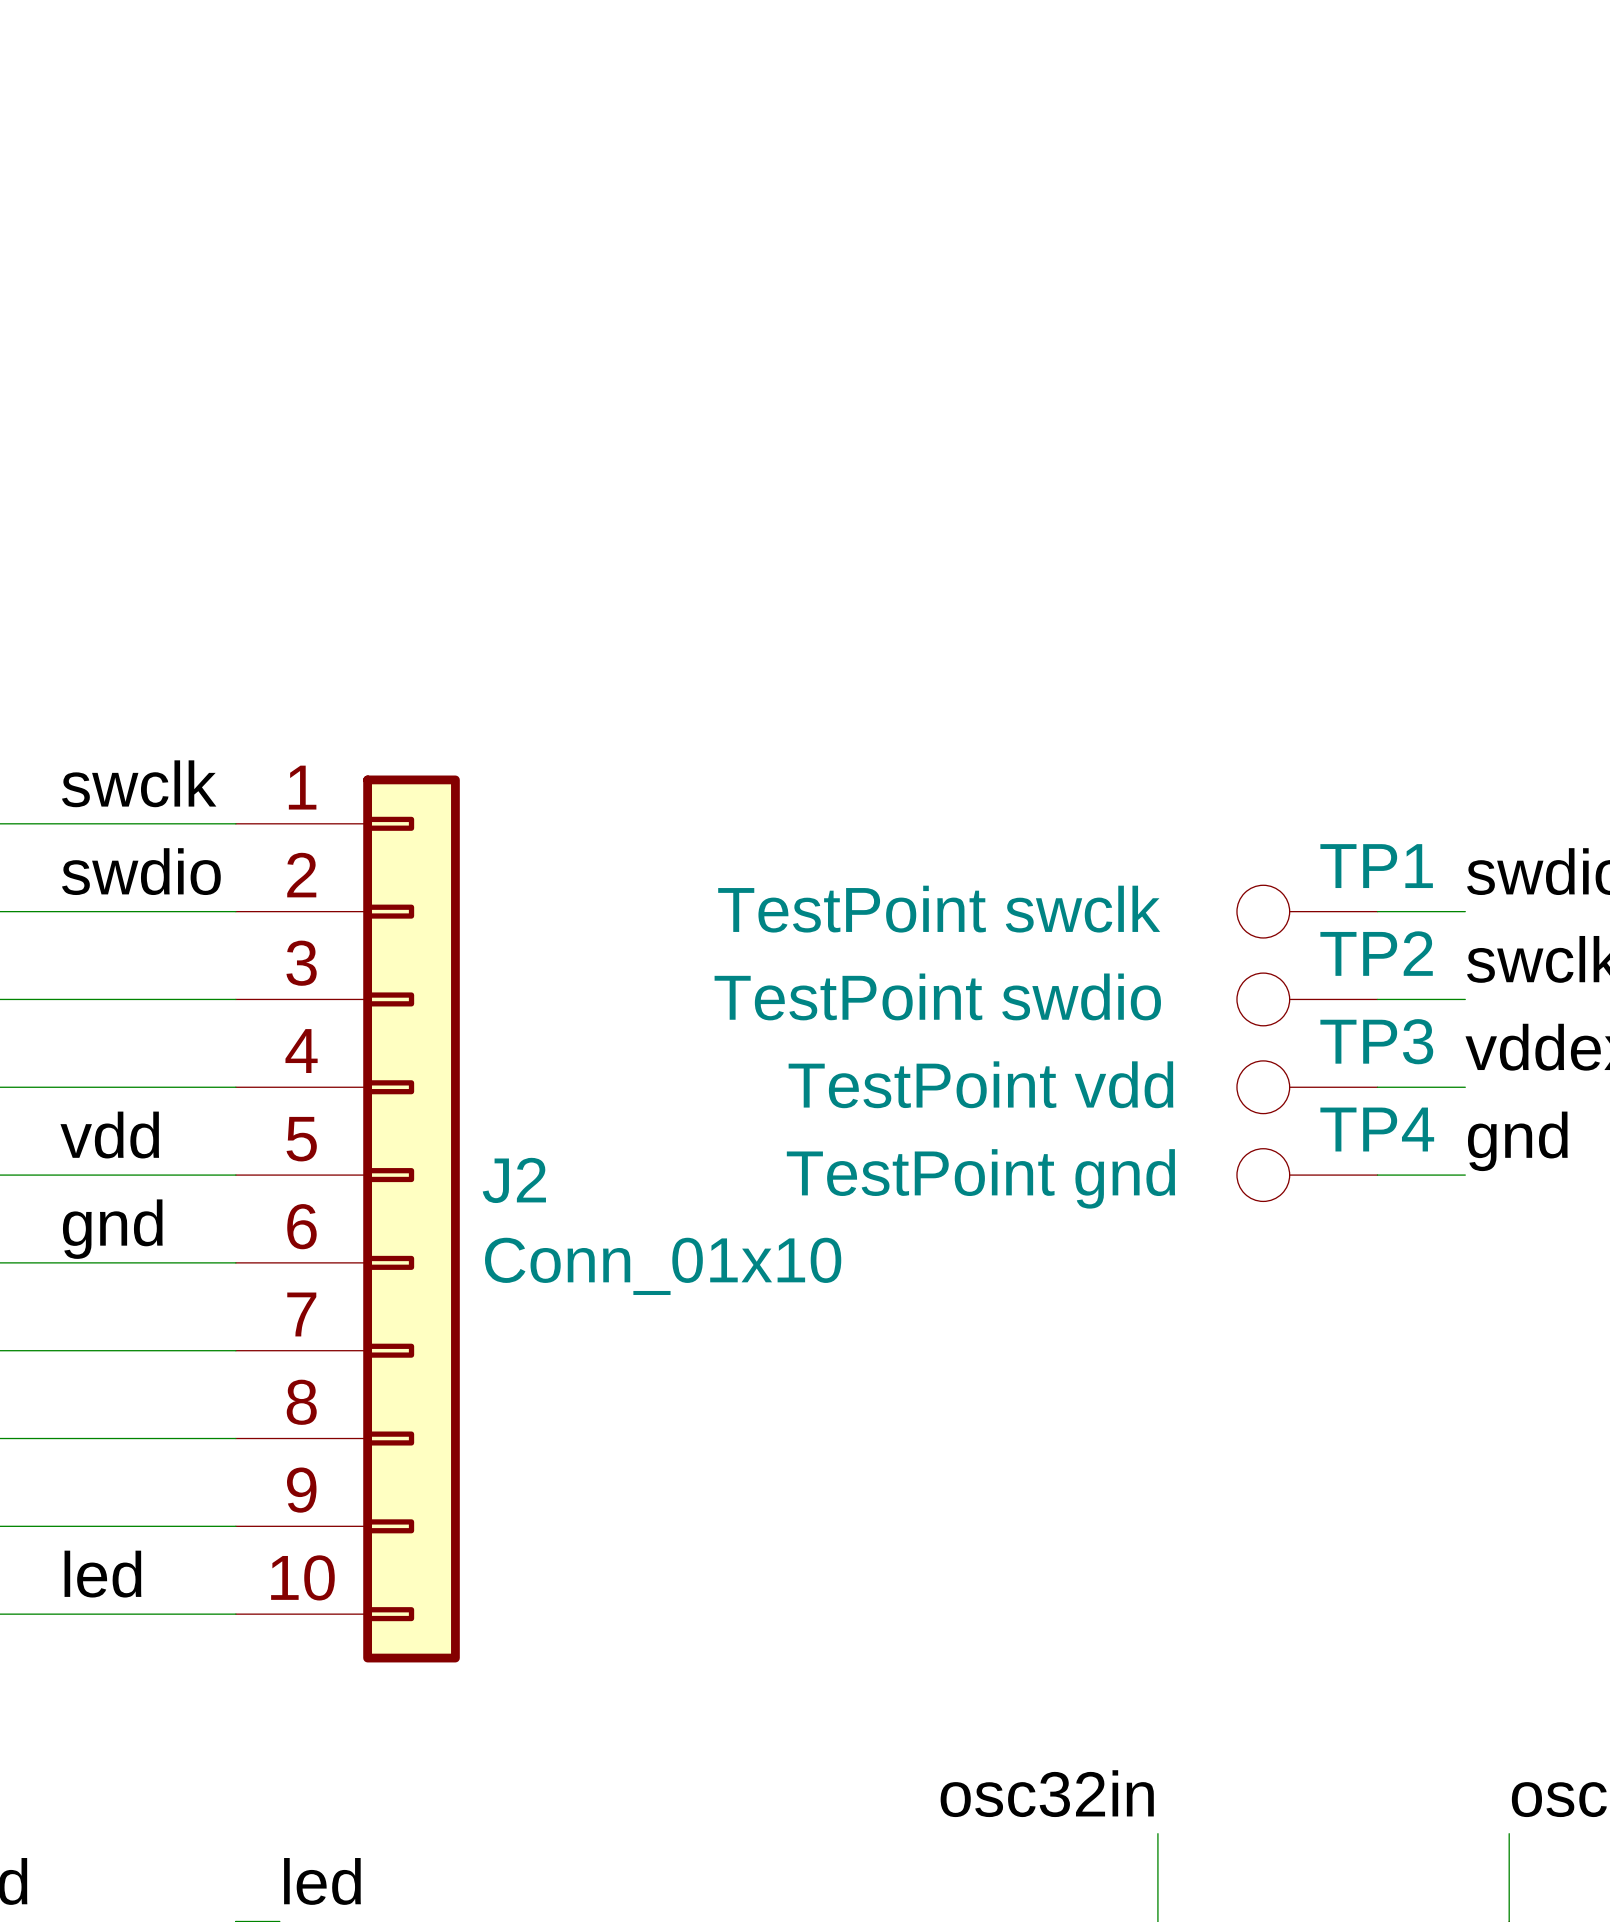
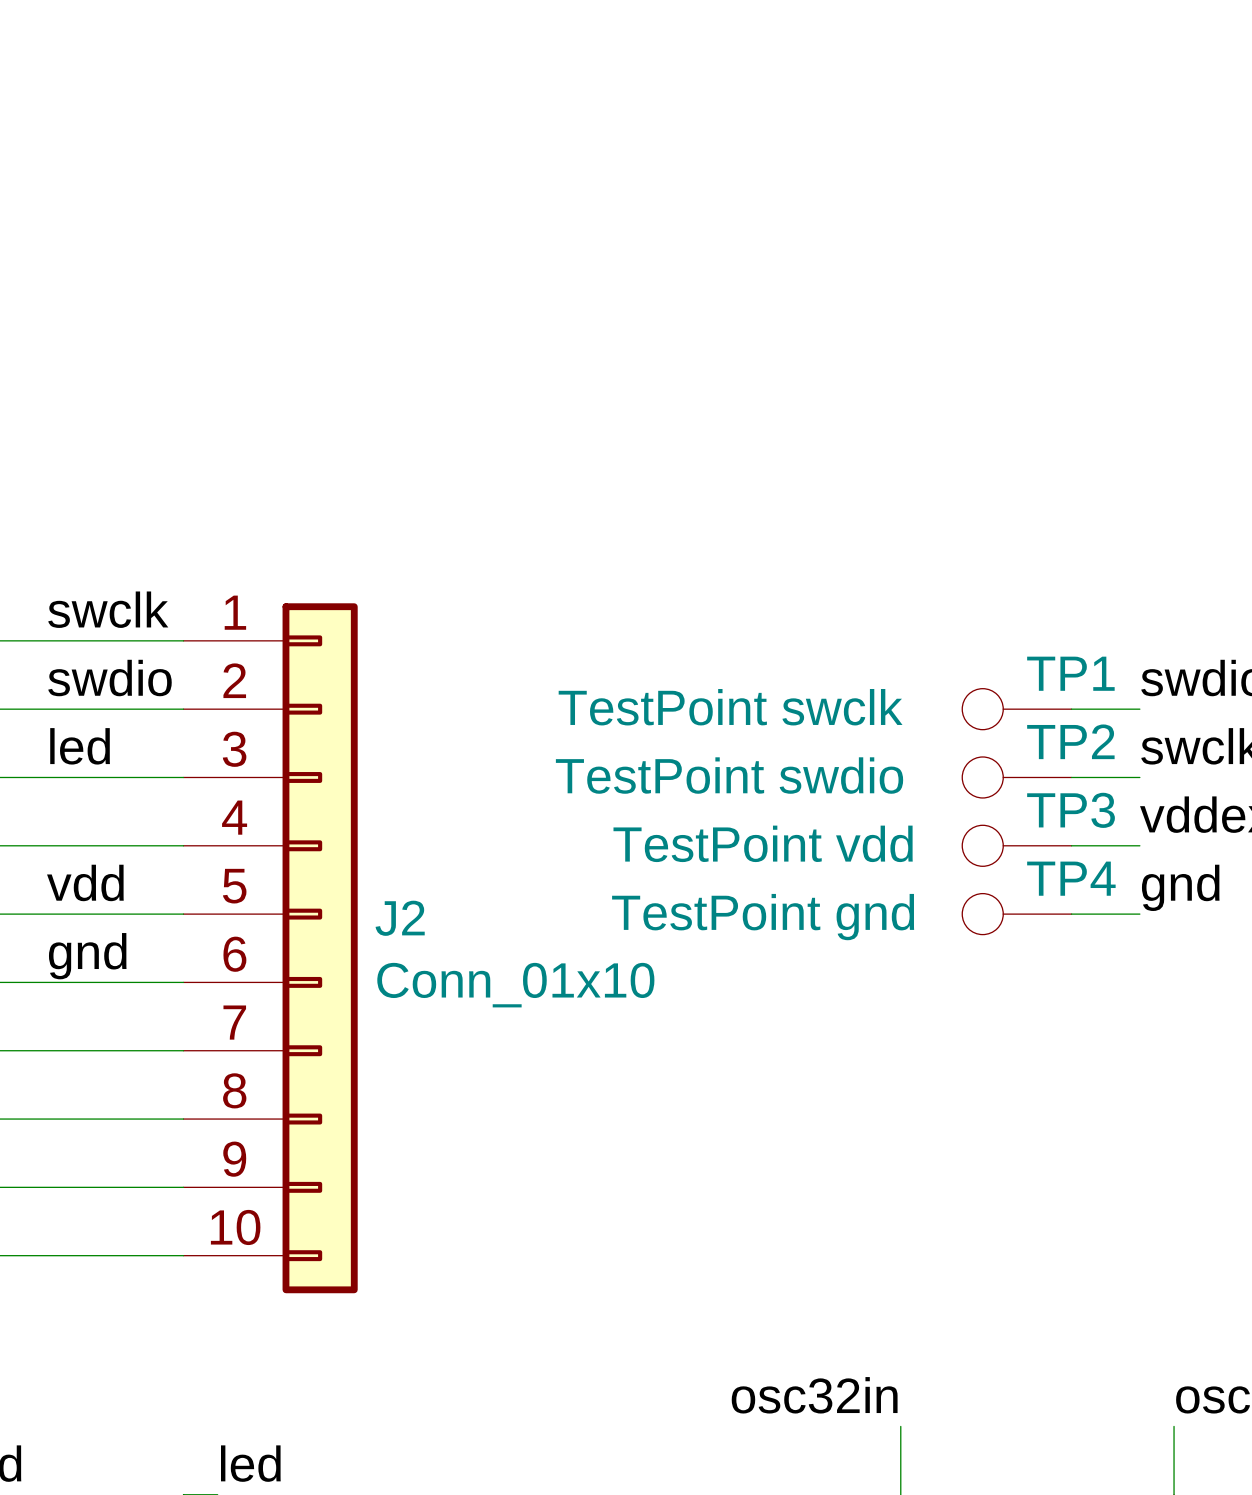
label position: led (102, 1574) -> led (80, 746)

